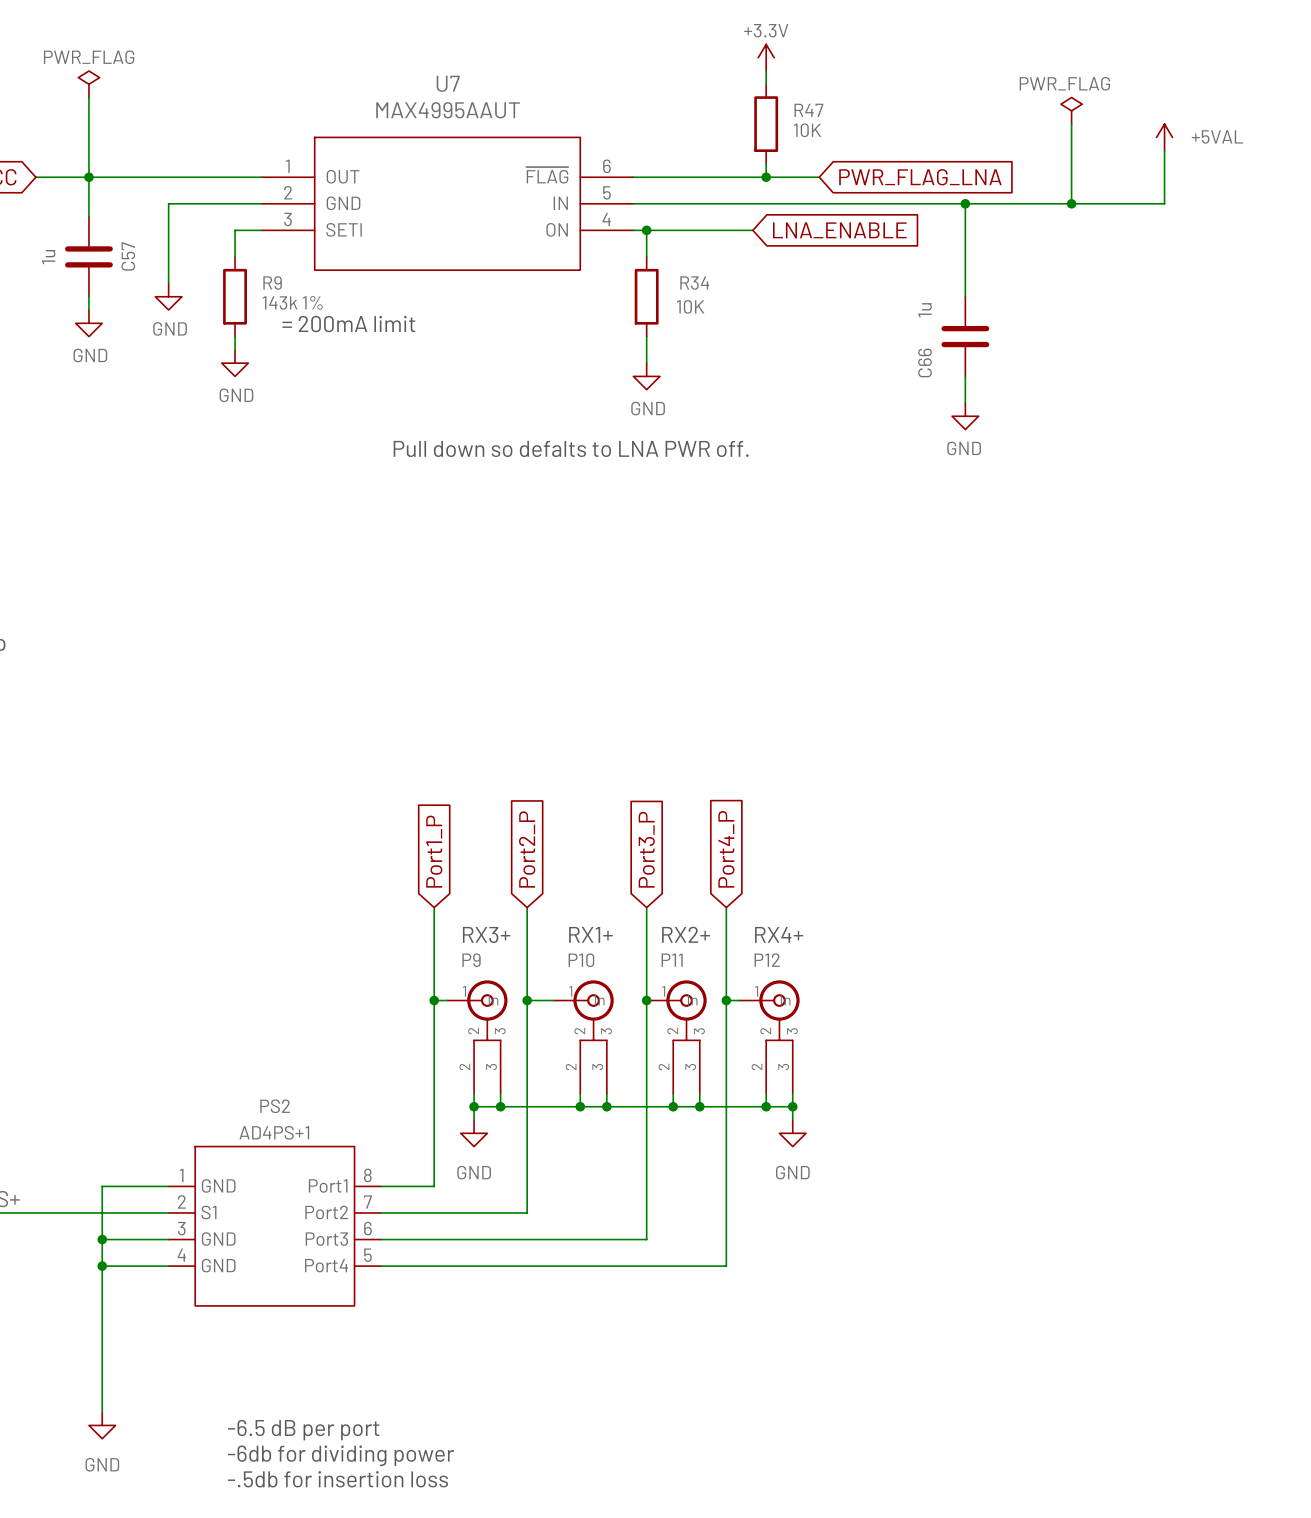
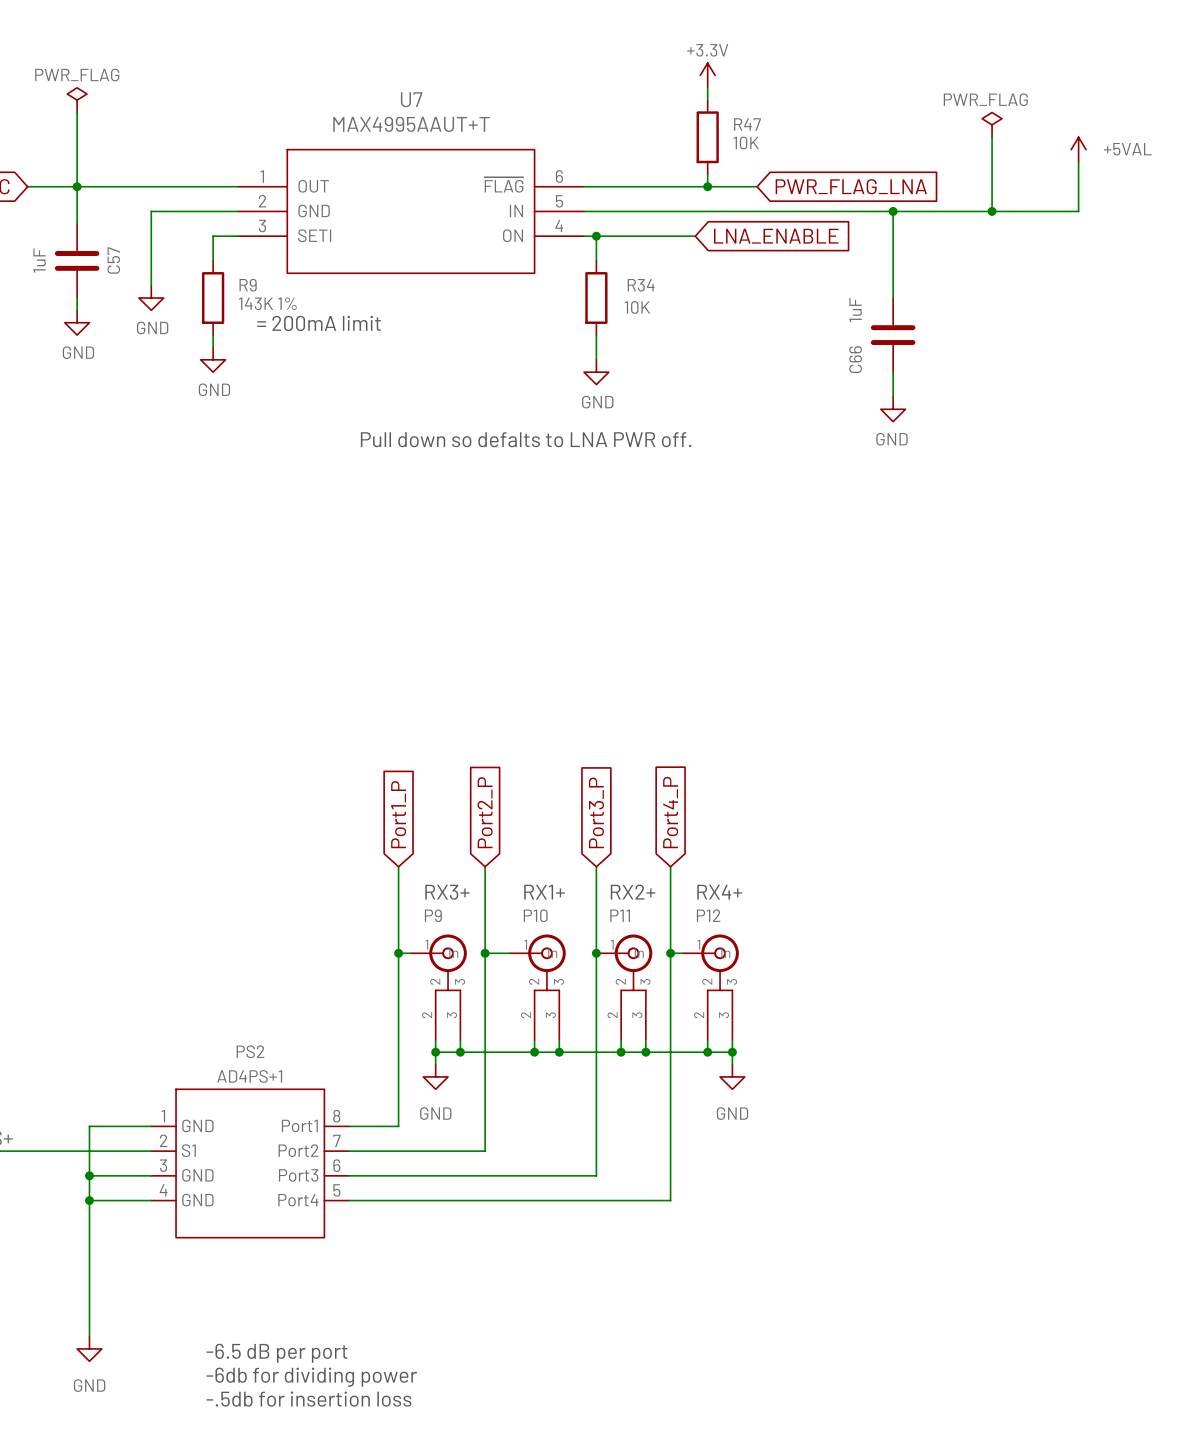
U7 value: MAX4995AAUT (448, 110) -> MAX4995AAUT+T (411, 124)
C57 value: 1u (48, 257) -> 1uF (39, 260)
R9 value: 143k 1% (292, 302) -> 143K 1% (267, 303)
C66 value: 1u (925, 310) -> 1uF (855, 310)

